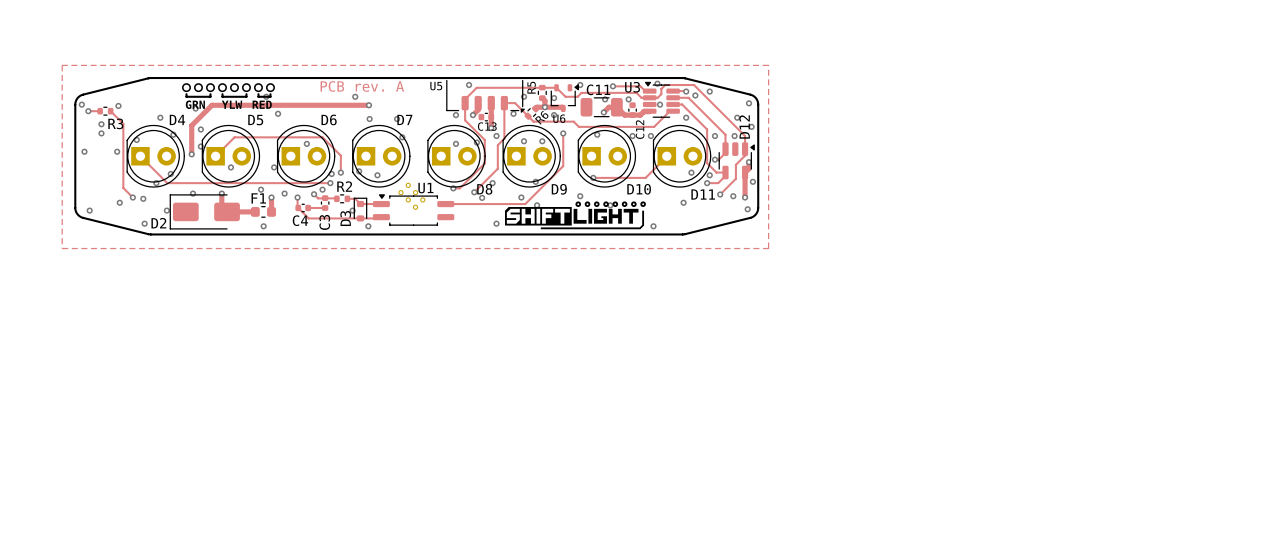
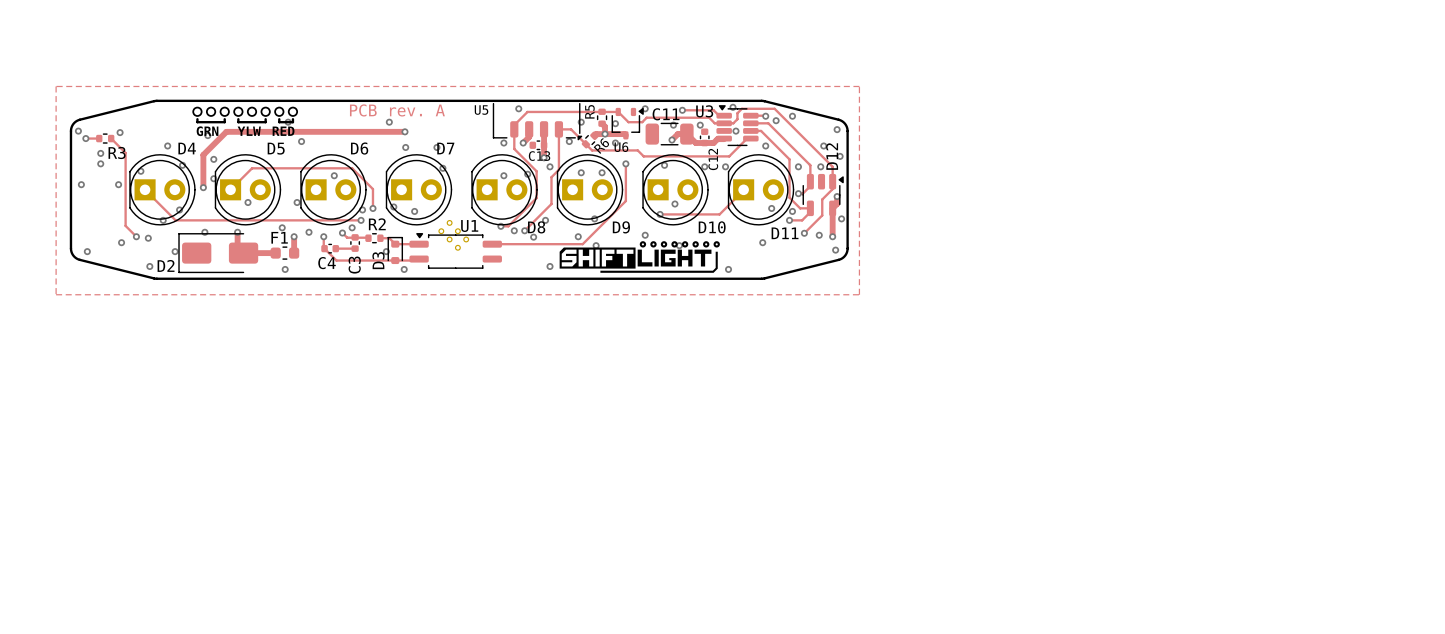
via: none -> (674, 204)
via: none -> (514, 230)

